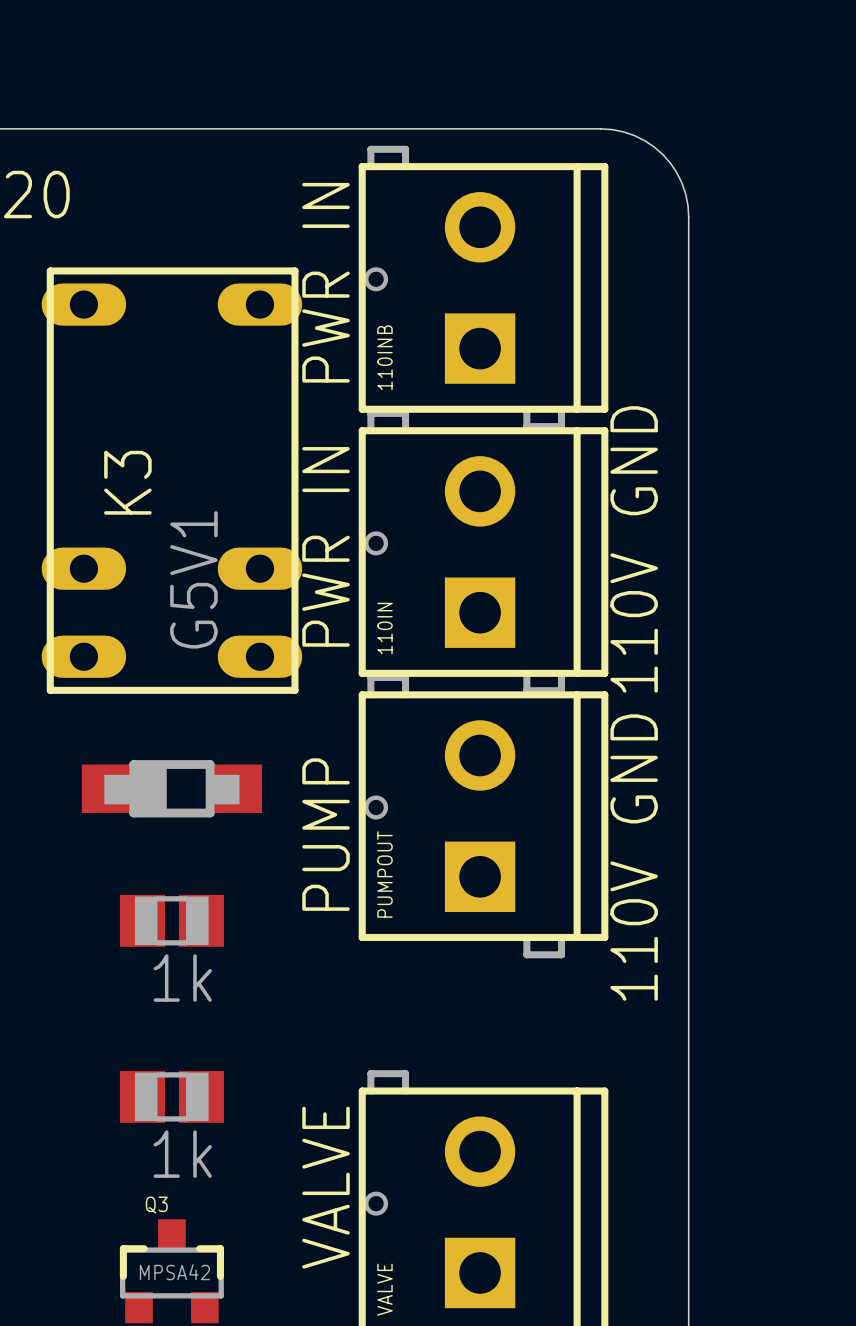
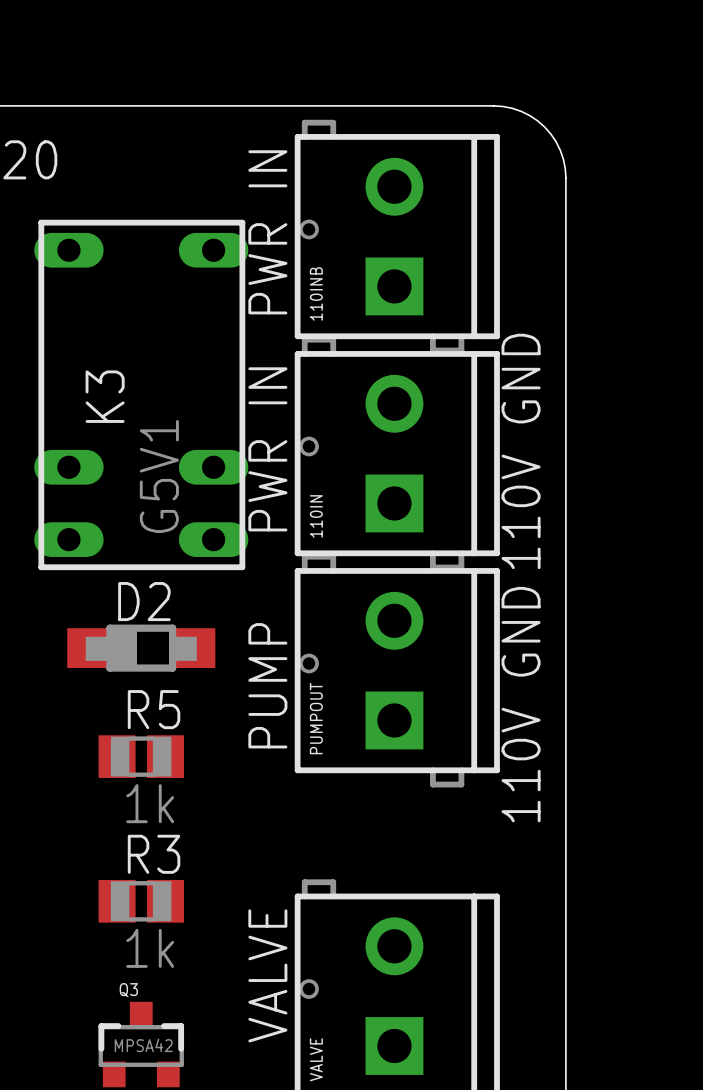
D2 name: none -> D2 (144, 601)
R5 name: none -> R5 (154, 709)
R3 name: none -> R3 (154, 854)

